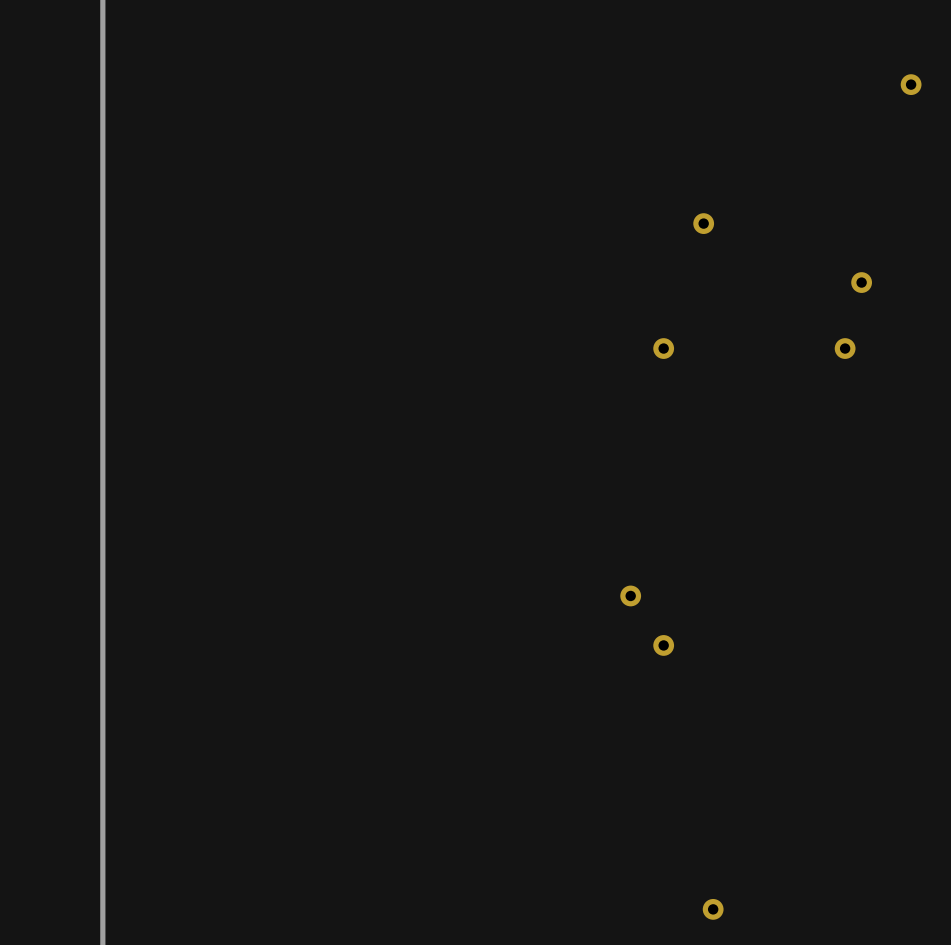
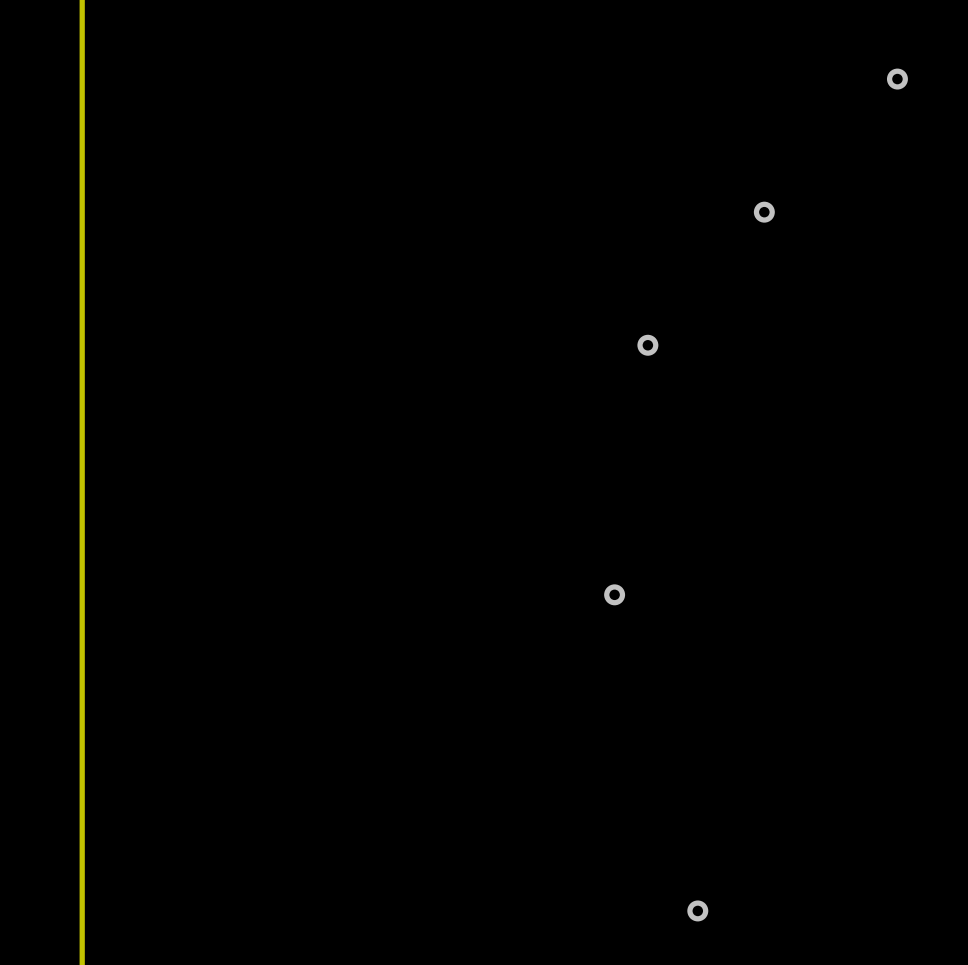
via: none -> (764, 212)
via: (703, 223) -> none
via: (861, 282) -> none
via: (845, 348) -> none
via: (663, 645) -> none

